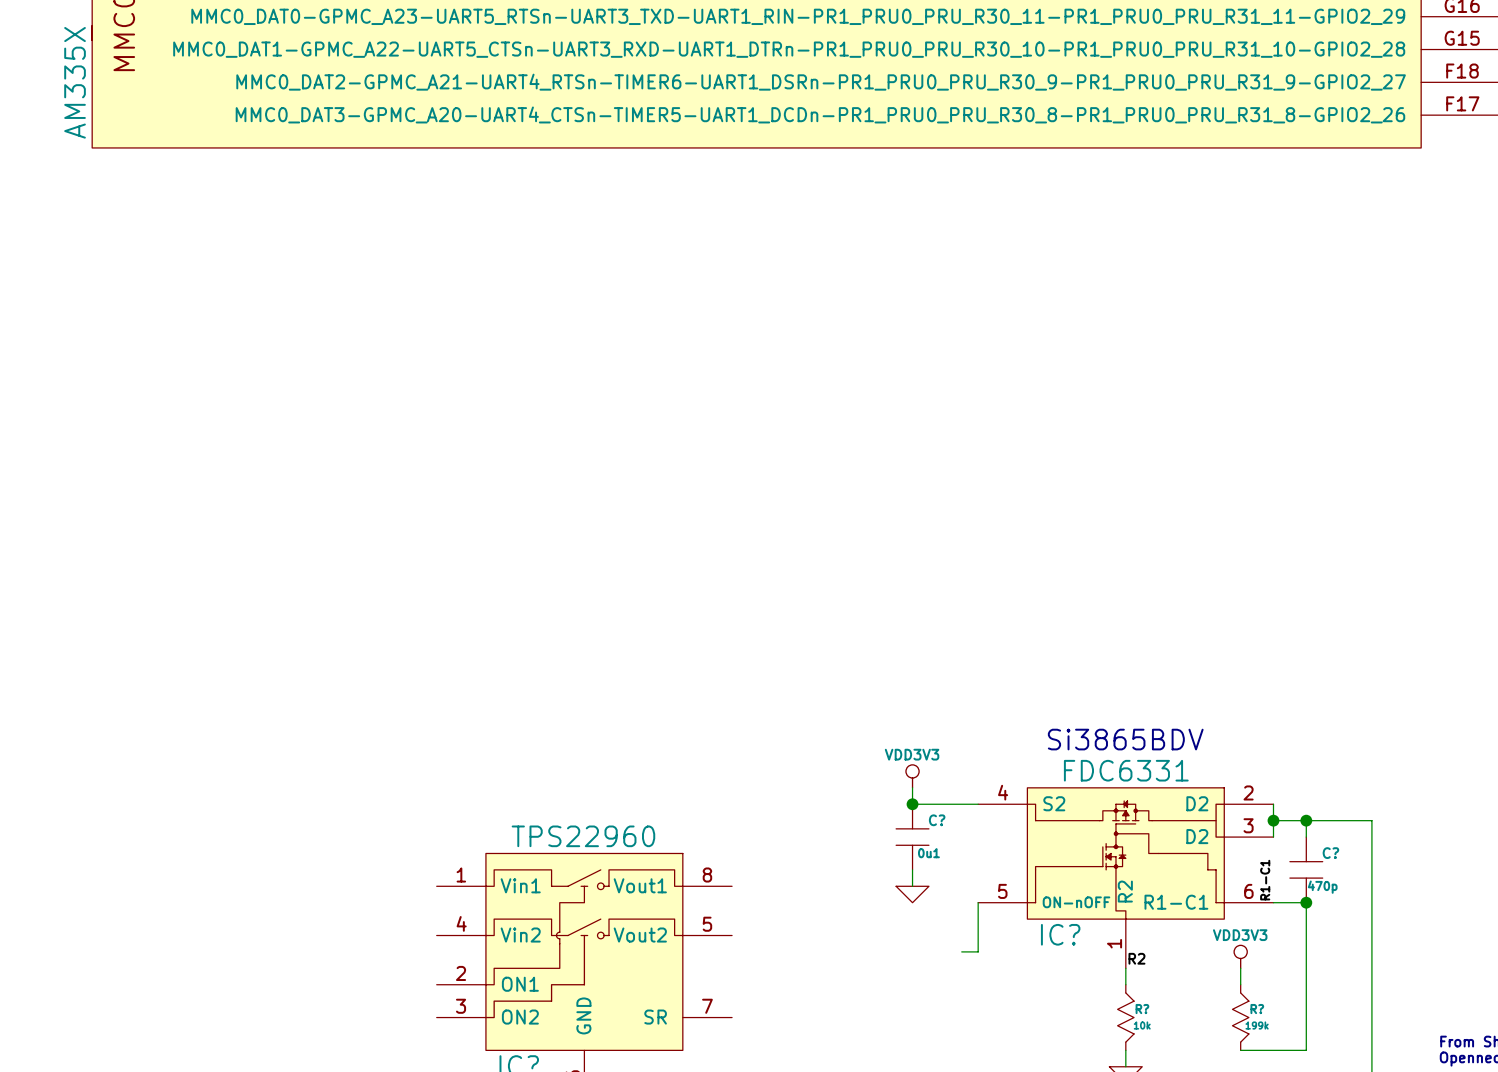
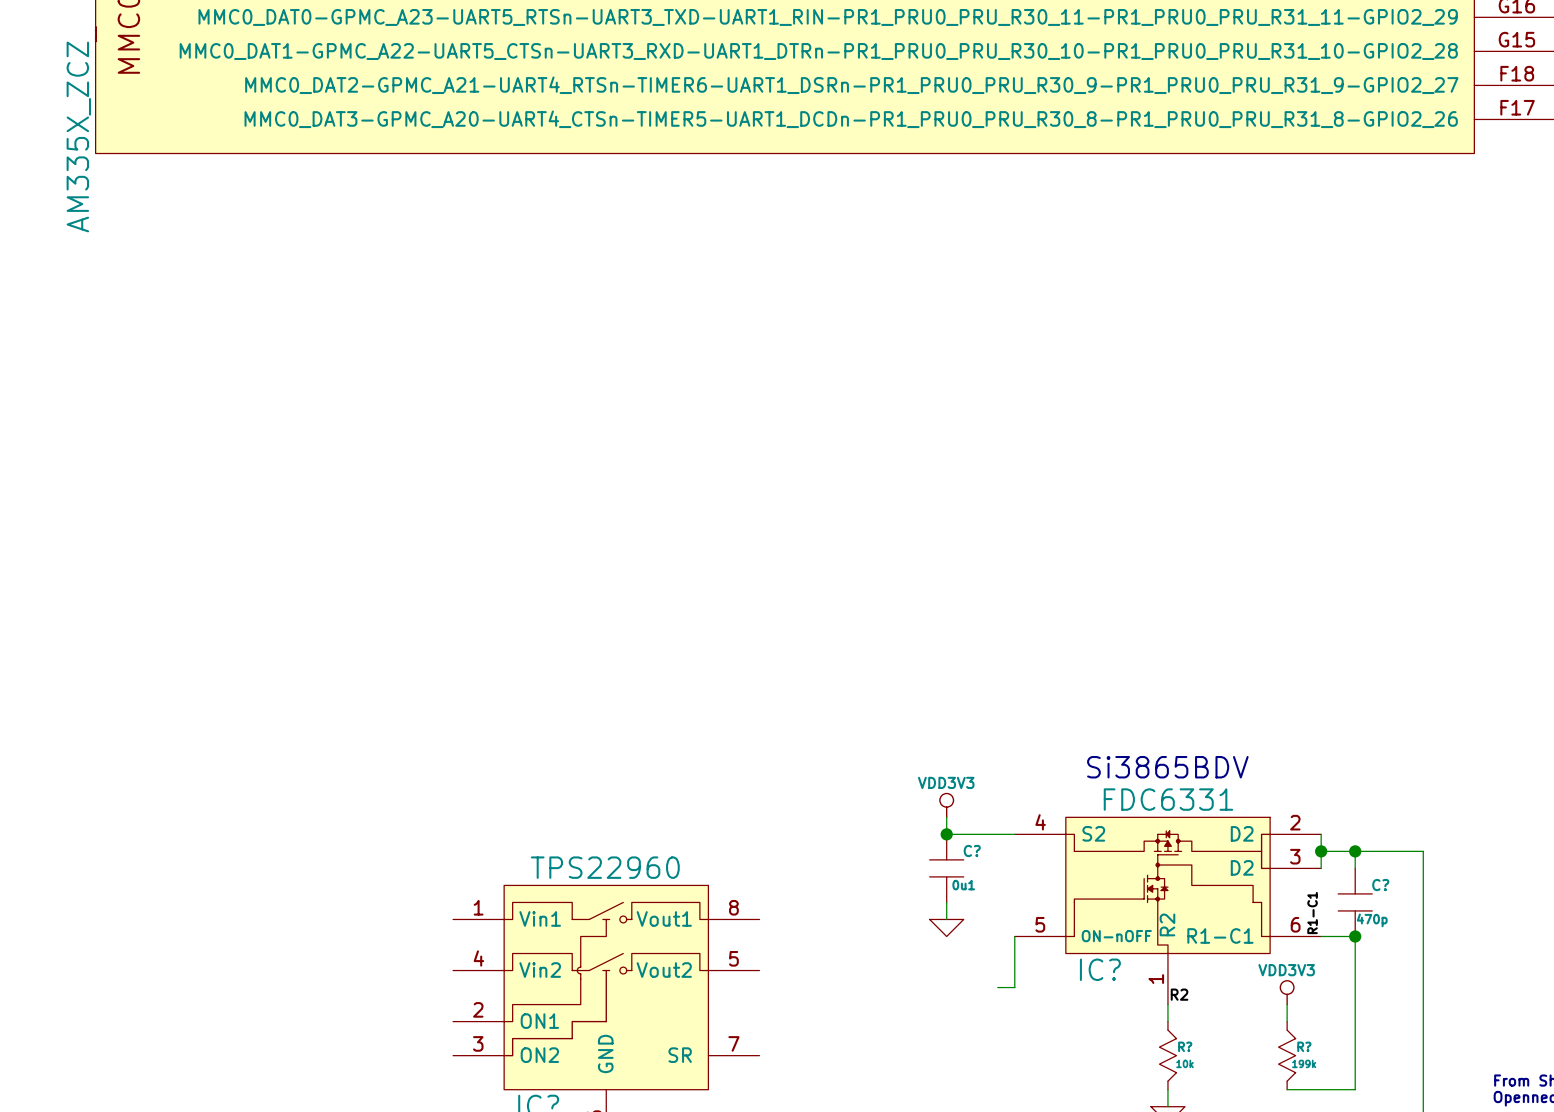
part value: AM335X (75, 82) -> AM335X_ZCZ (78, 136)

